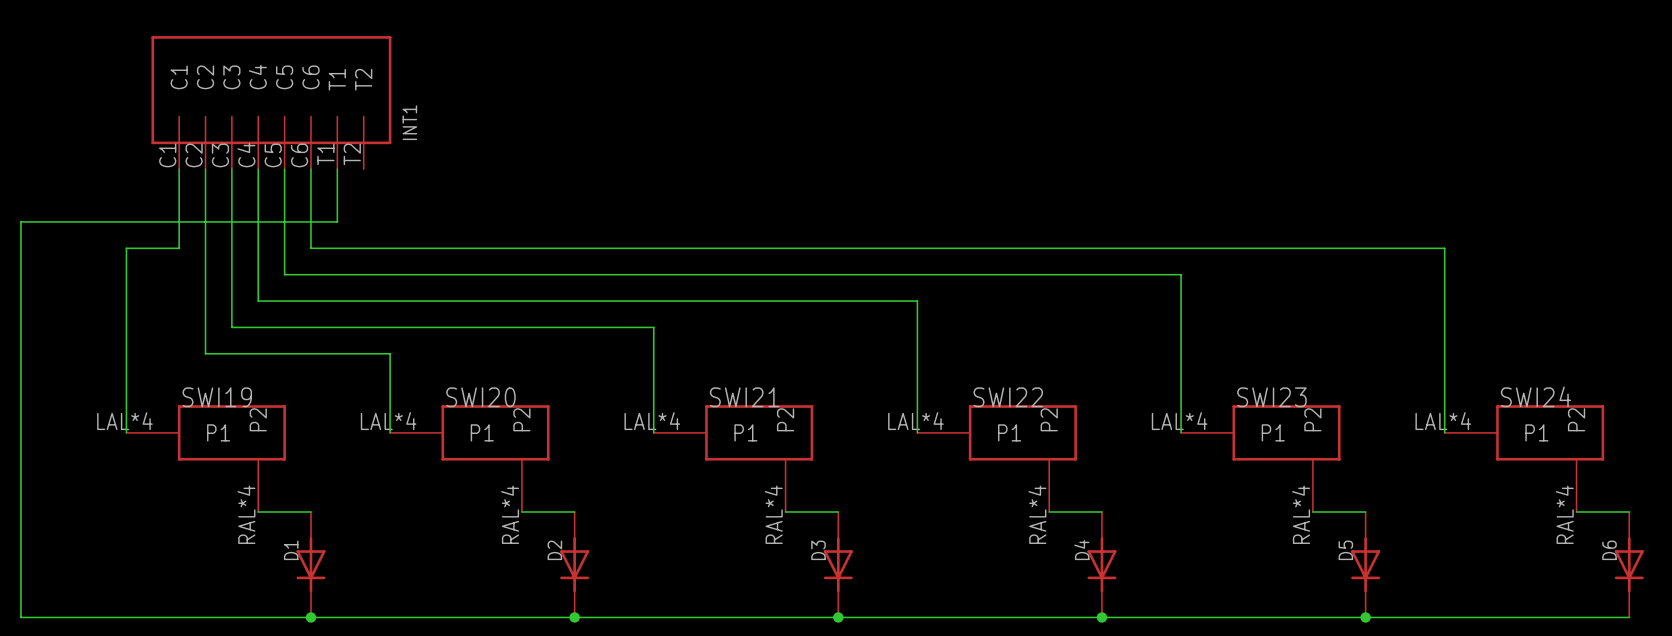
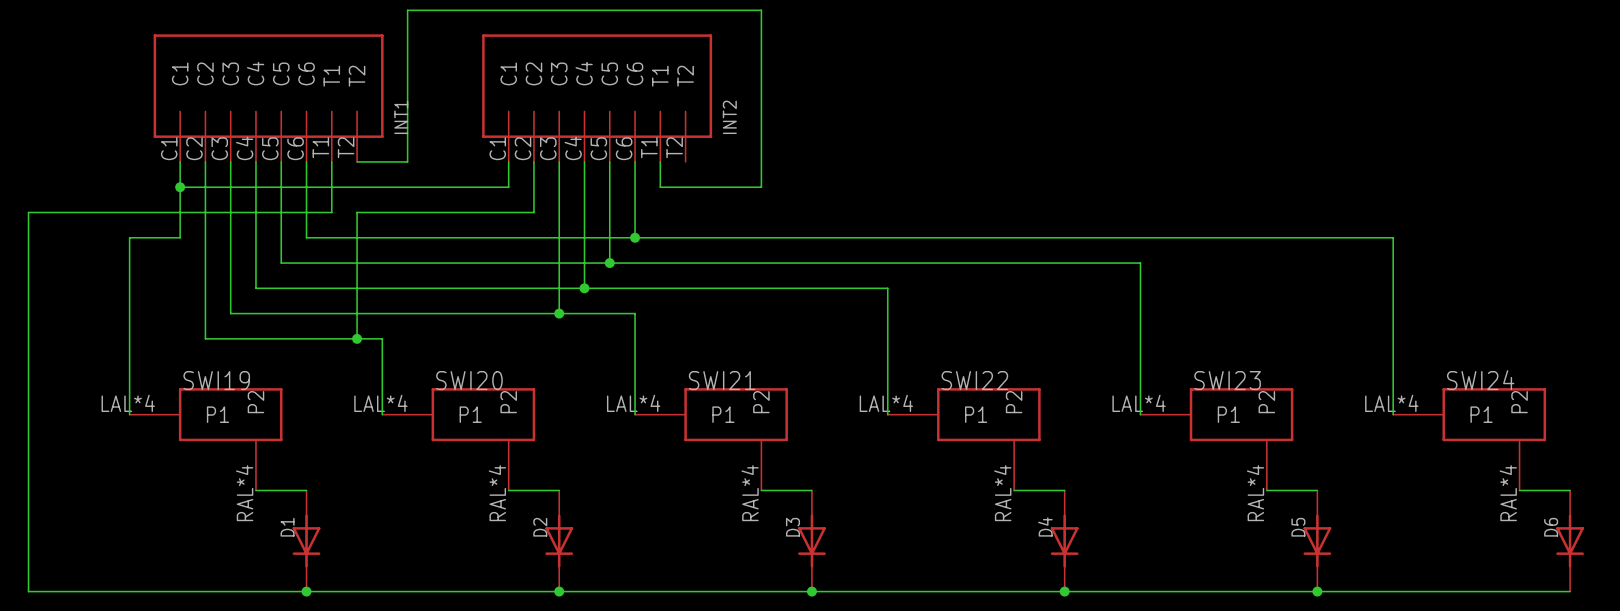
INT2: none -> (597, 98)
wire: none -> (357, 161) (407, 161) (407, 10) (761, 10) (761, 187) (660, 187) (660, 161)
wire: none -> (508, 161) (508, 187) (180, 187)
wire: none -> (533, 161) (533, 212) (357, 212) (357, 338)
wire: none -> (559, 161) (559, 313)
wire: none -> (584, 161) (584, 288)
wire: none -> (609, 161) (609, 263)
wire: none -> (635, 161) (635, 237)
junction: none -> (180, 187)
junction: none -> (635, 237)
junction: none -> (609, 263)
junction: none -> (584, 288)
junction: none -> (559, 313)
junction: none -> (357, 338)

